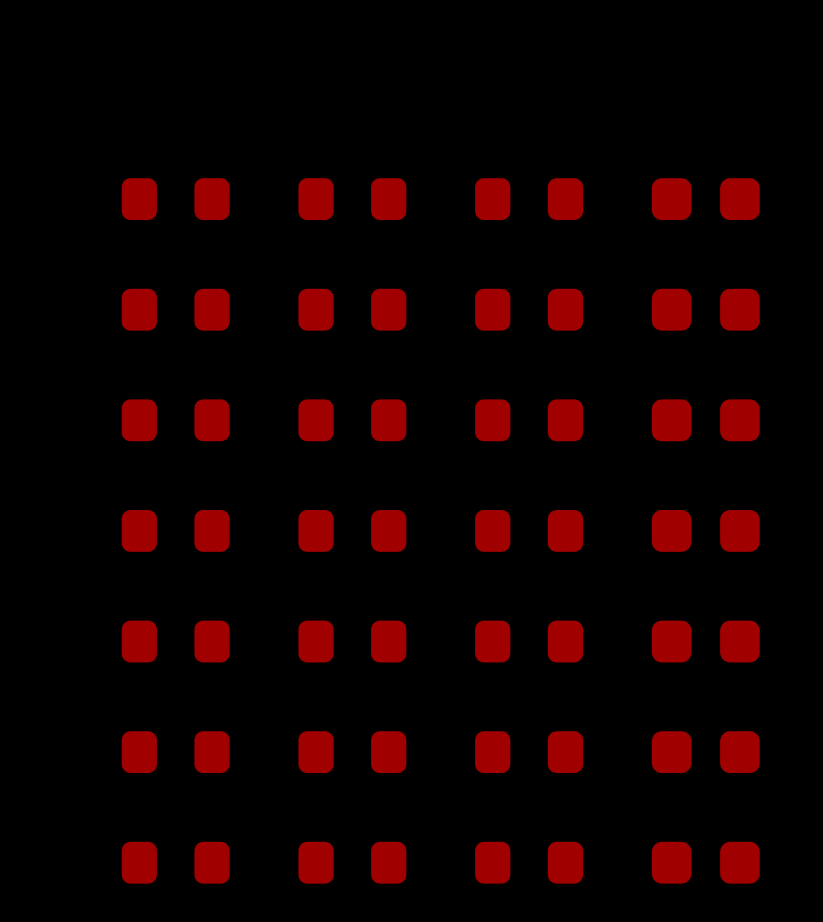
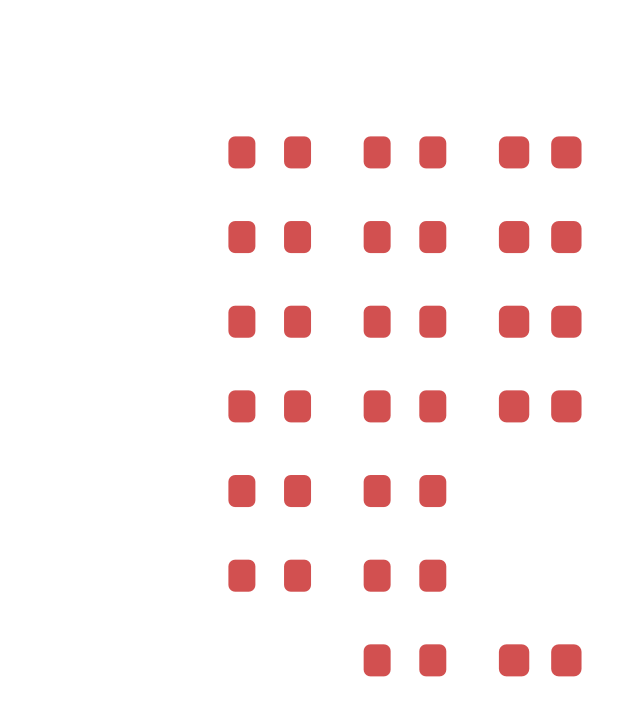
part: (175, 199) -> none
part: (175, 309) -> none
part: (175, 420) -> none
part: (175, 530) -> none
part: (175, 641) -> none
part: (705, 641) -> none
part: (175, 752) -> none
part: (705, 752) -> none
part: (175, 862) -> none
part: (352, 862) -> none

